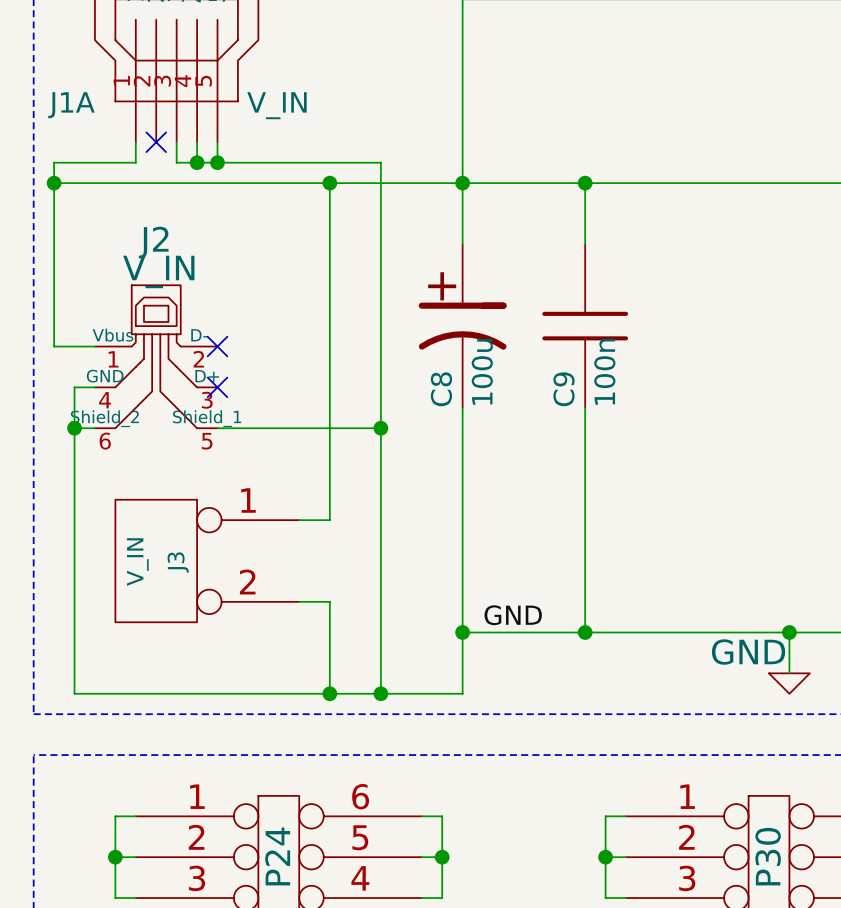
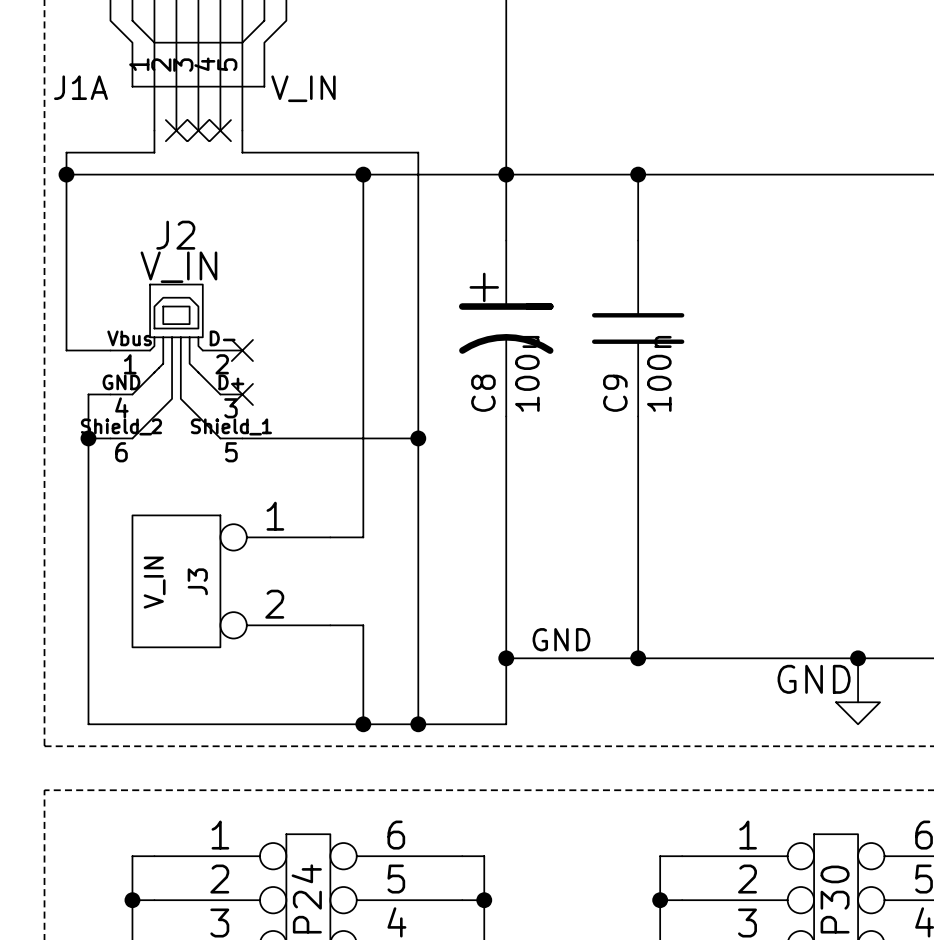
wire: (176, 142) (176, 162) (217, 162) -> none
no-connect mark: none -> (198, 130)
wire: (197, 142) (197, 162) -> none
no-connect mark: none -> (220, 130)
junction: (197, 162) -> none
junction: (217, 162) -> none

